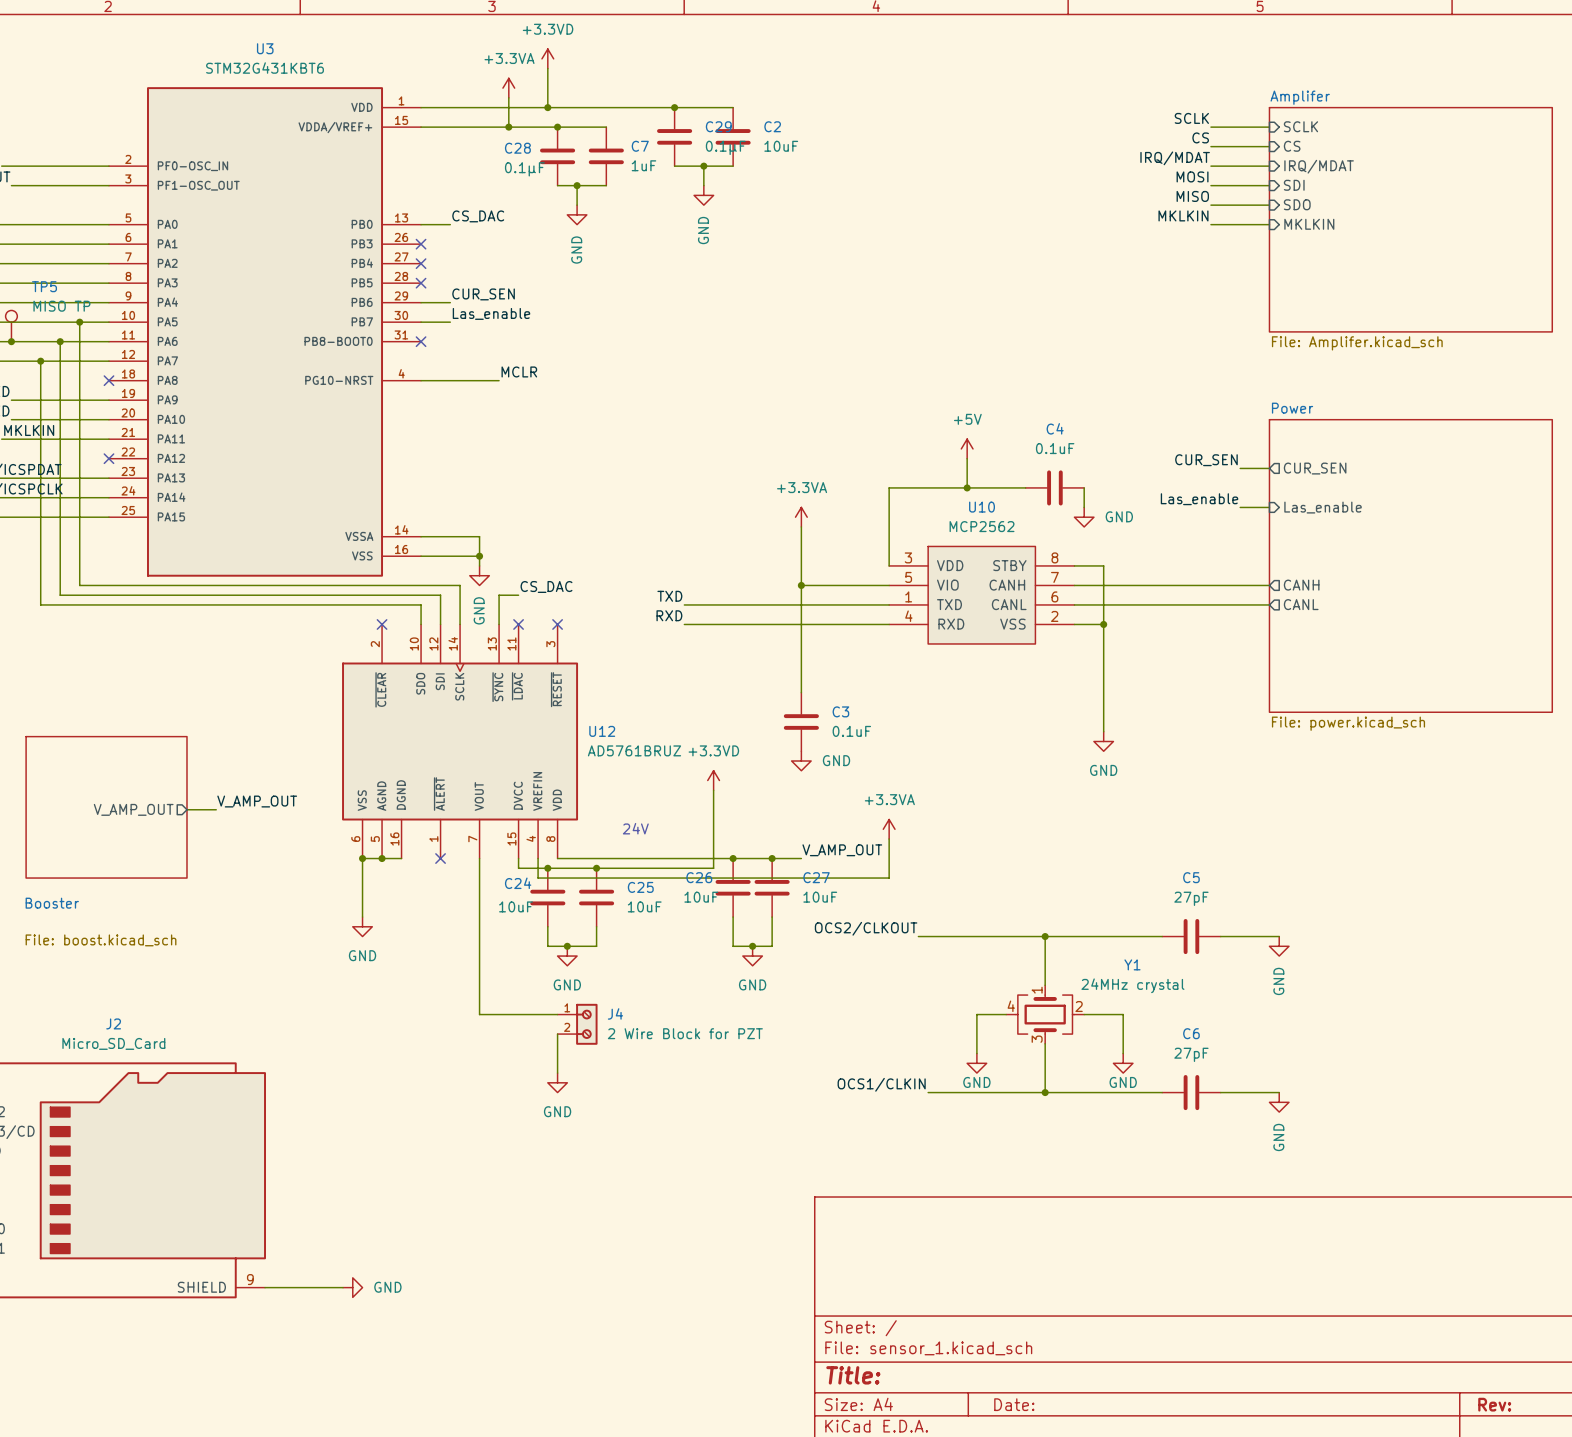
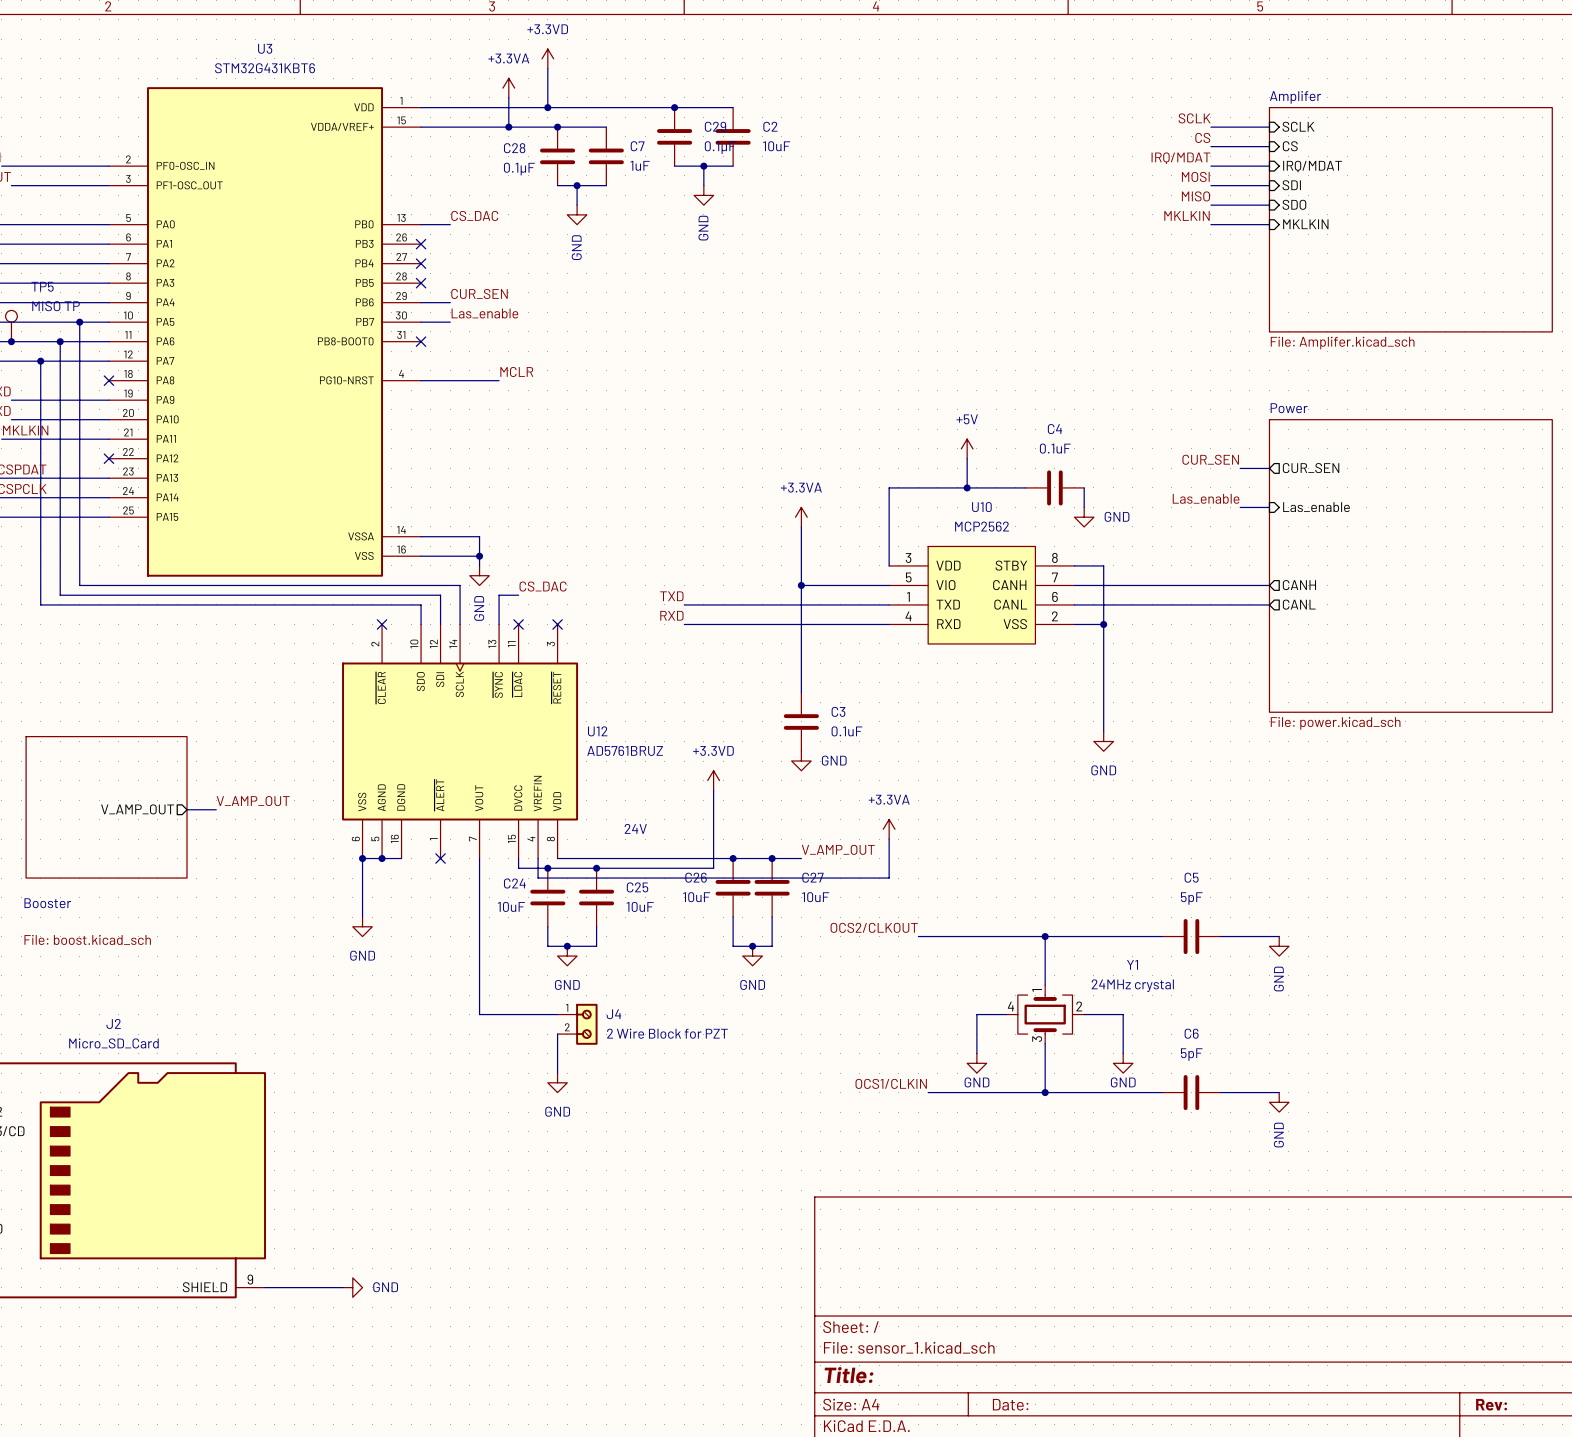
C5 value: 27pF (1191, 898) -> 5pF (1191, 898)
C6 value: 27pF (1191, 1054) -> 5pF (1191, 1054)

